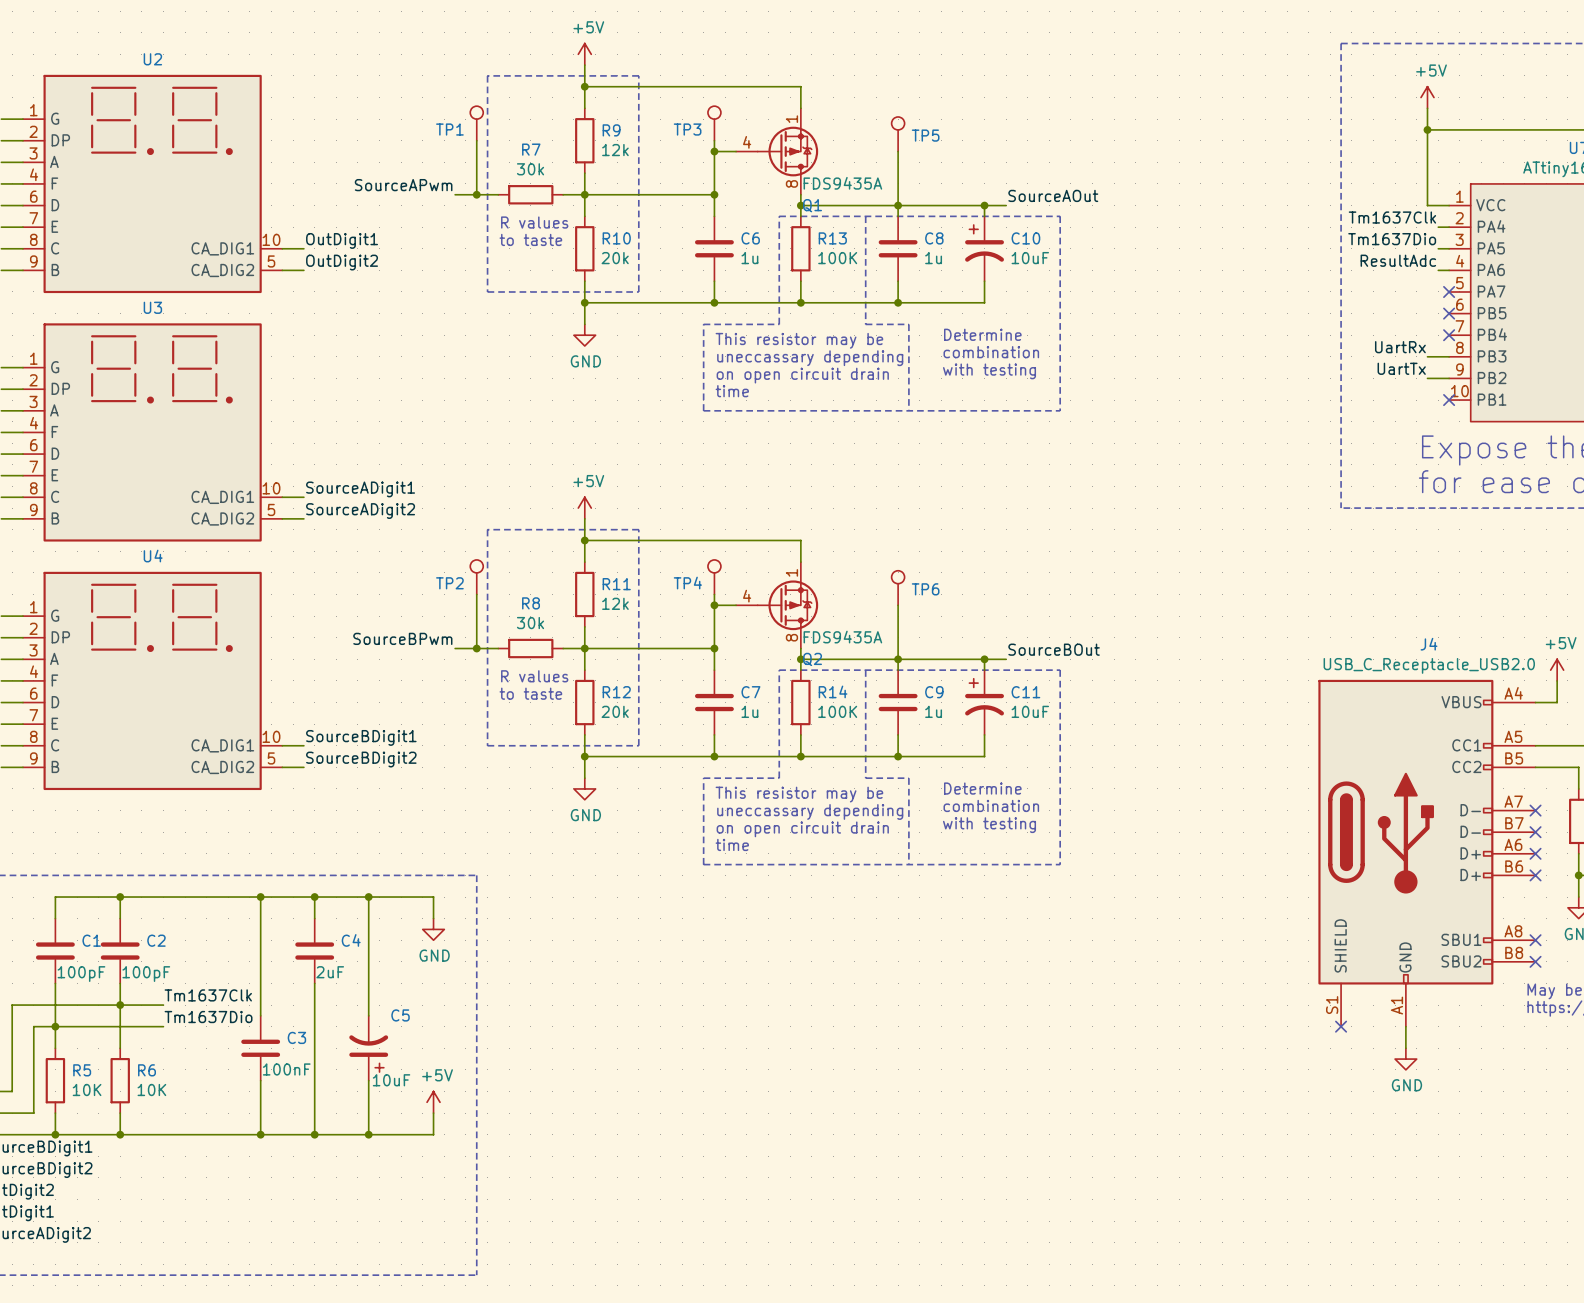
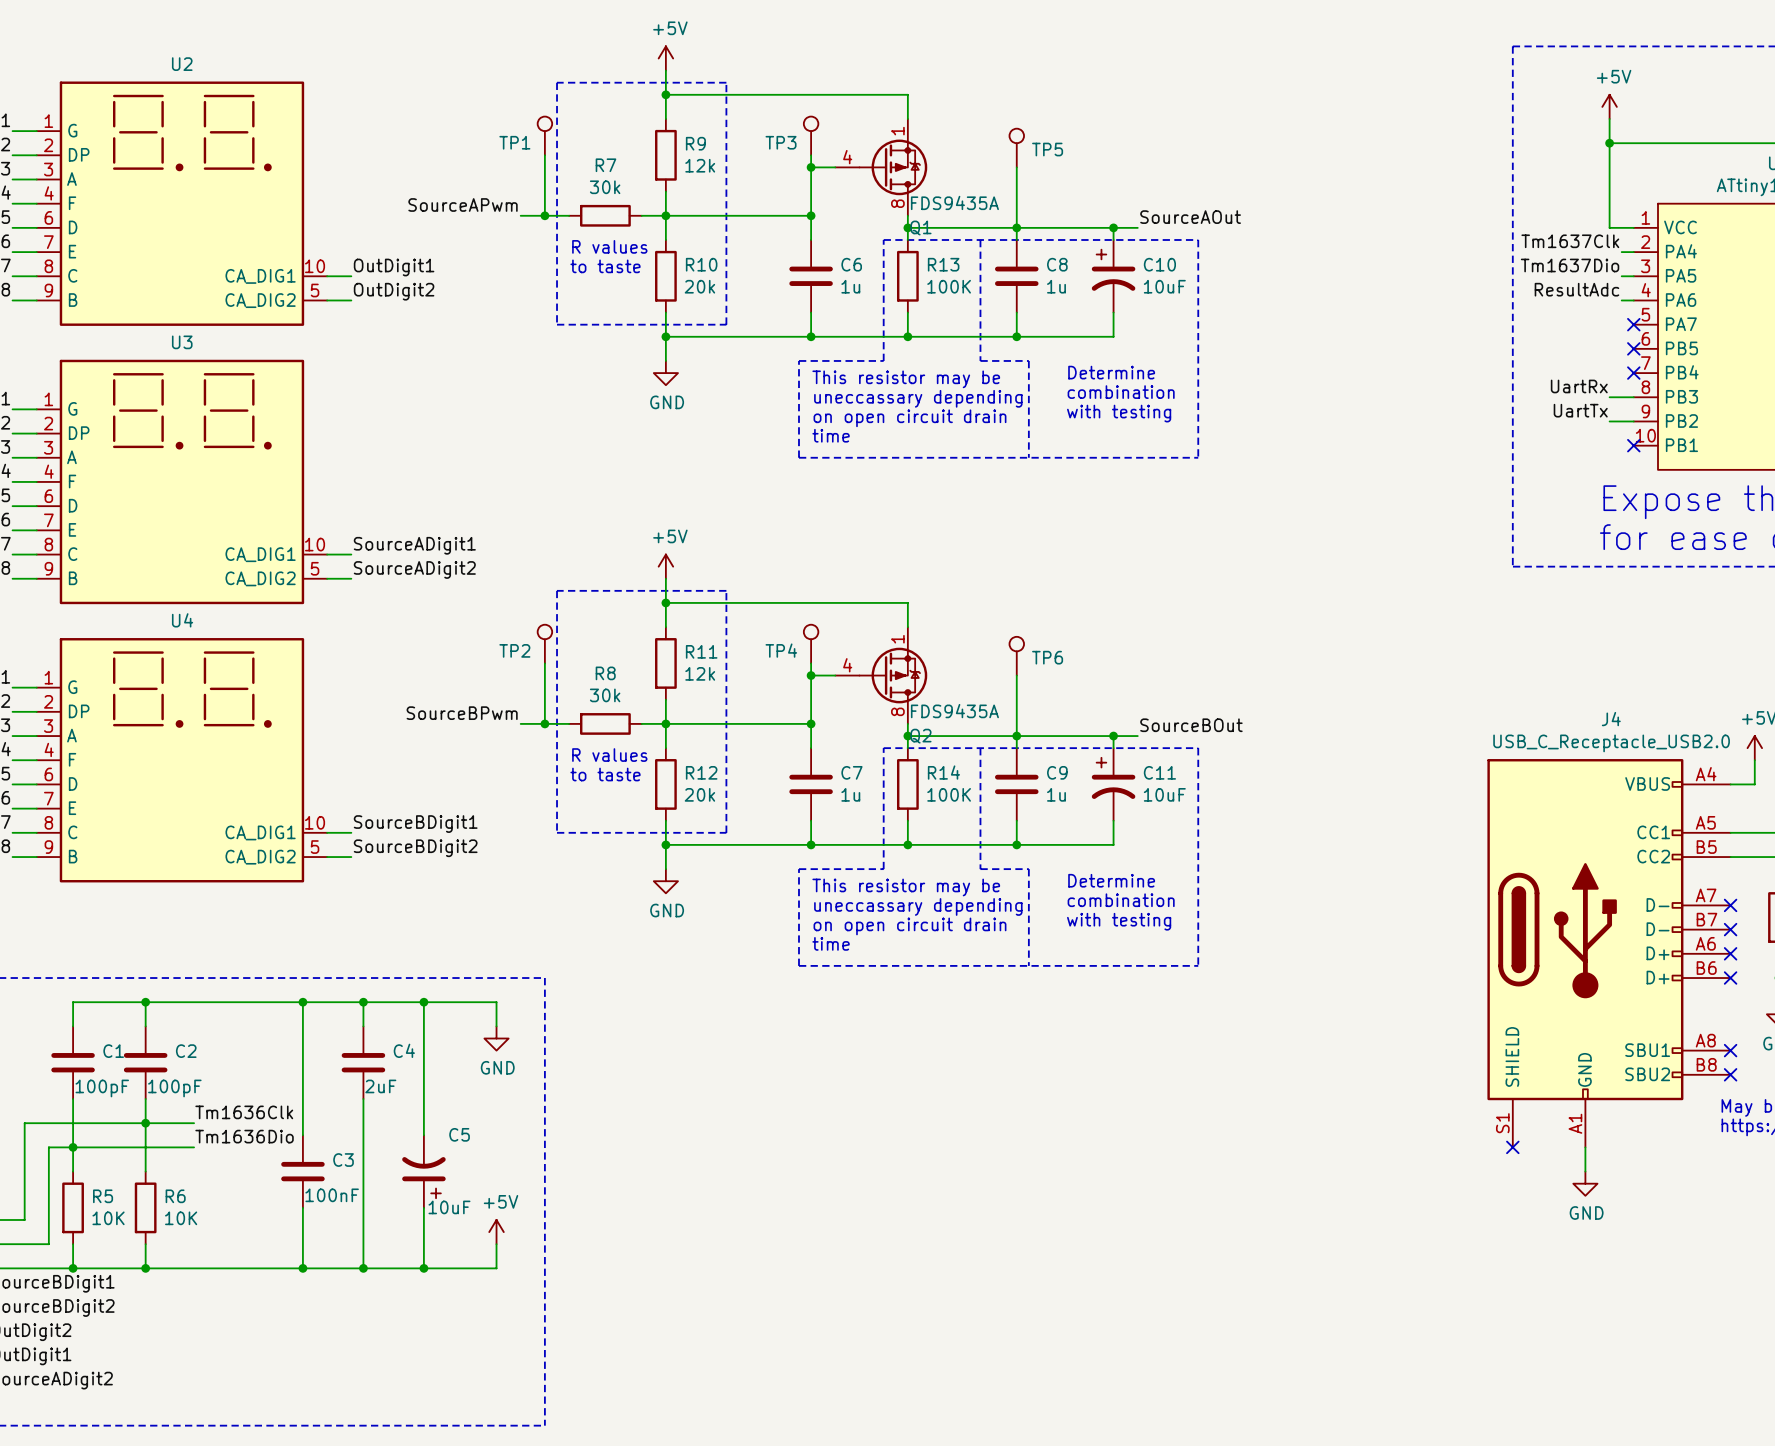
label: Tm1637Clk (208, 995) -> Tm1636Clk (244, 1112)
label: Tm1637Dio (208, 1017) -> Tm1636Dio (244, 1136)

